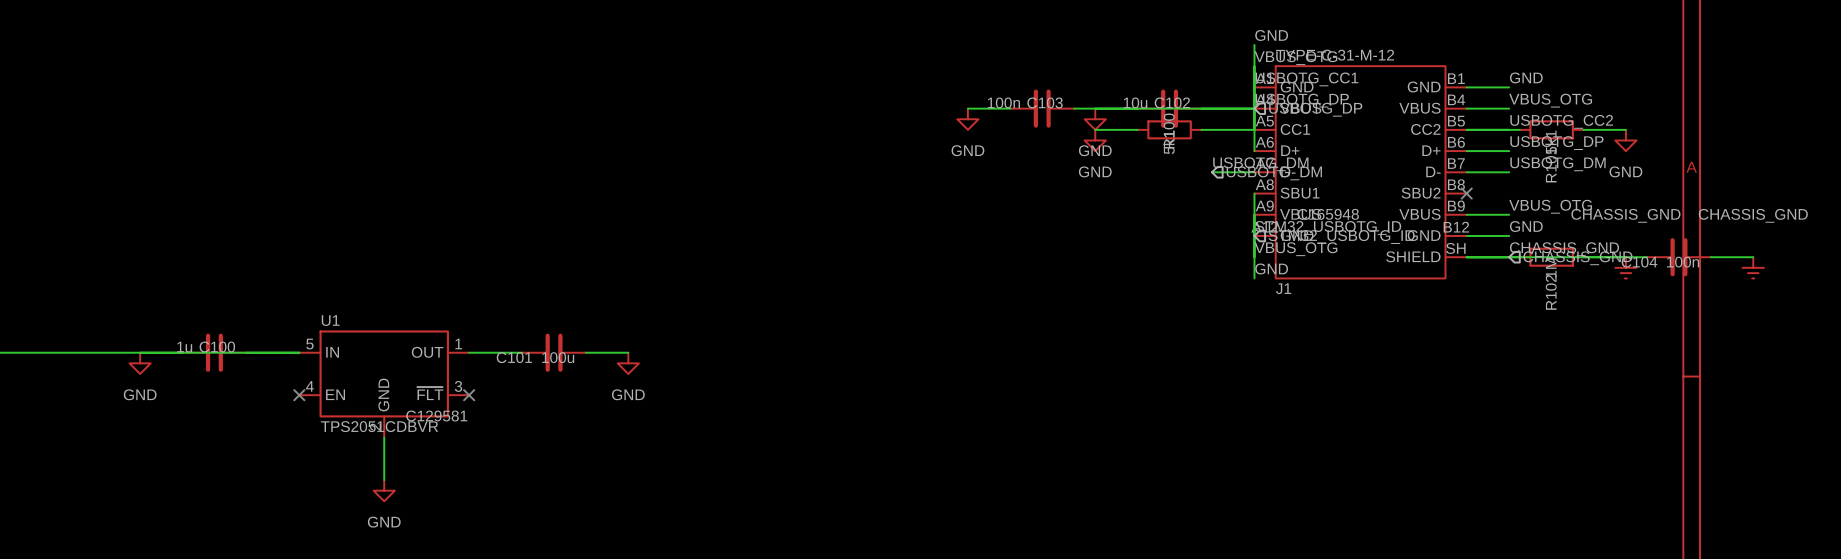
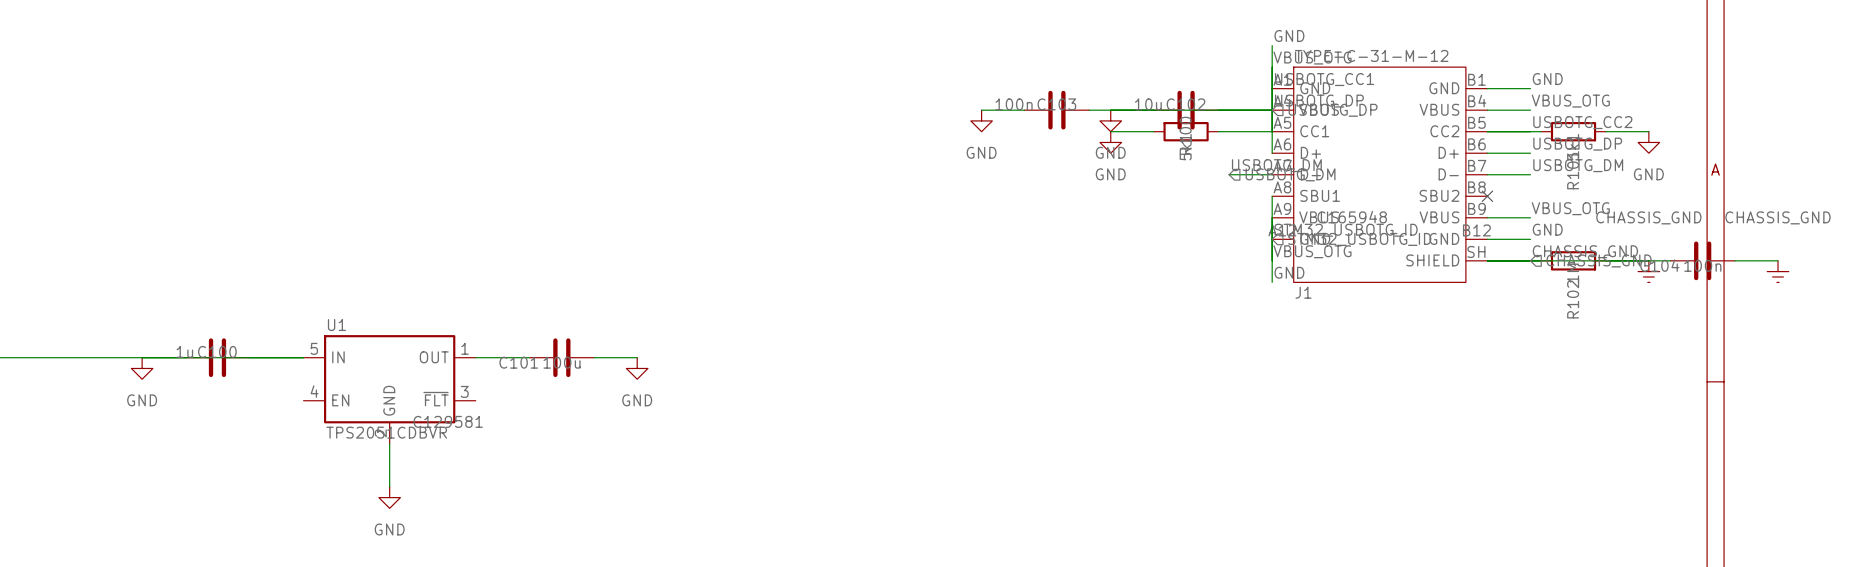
no-connect mark: (299, 395) -> none
no-connect mark: (469, 395) -> none

